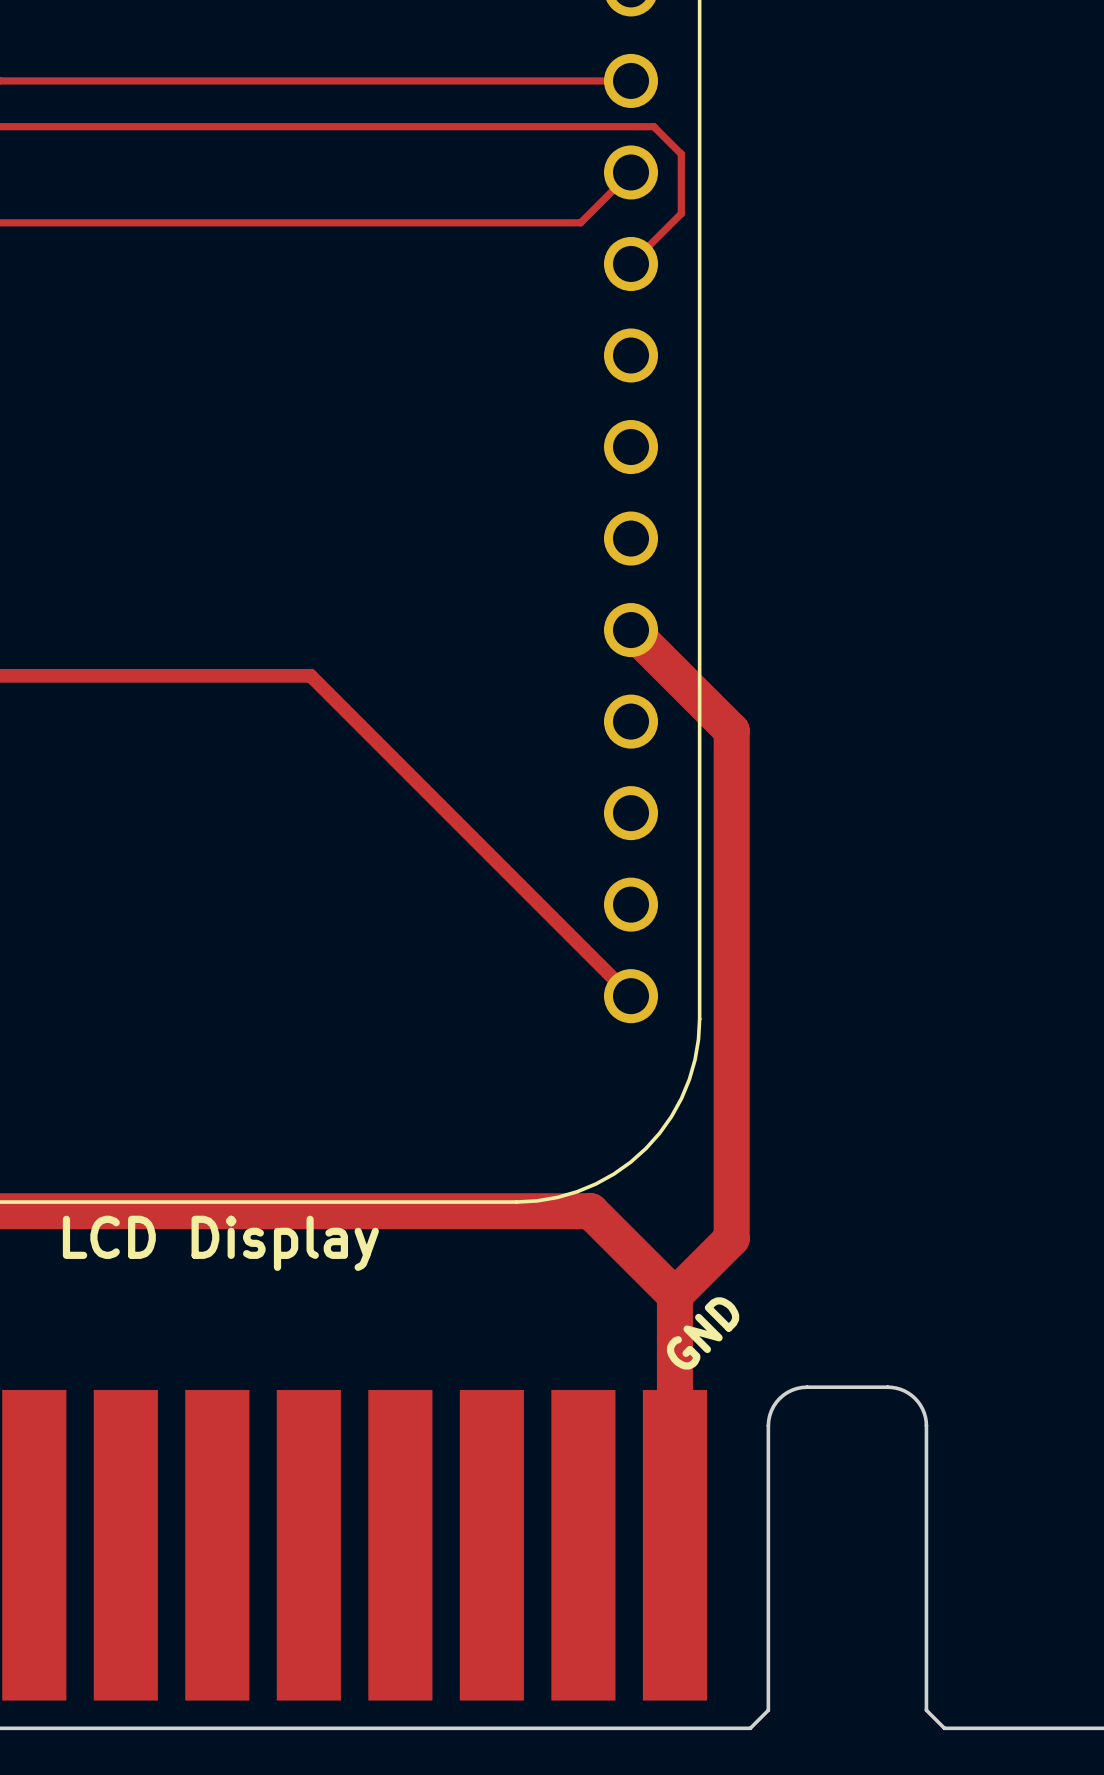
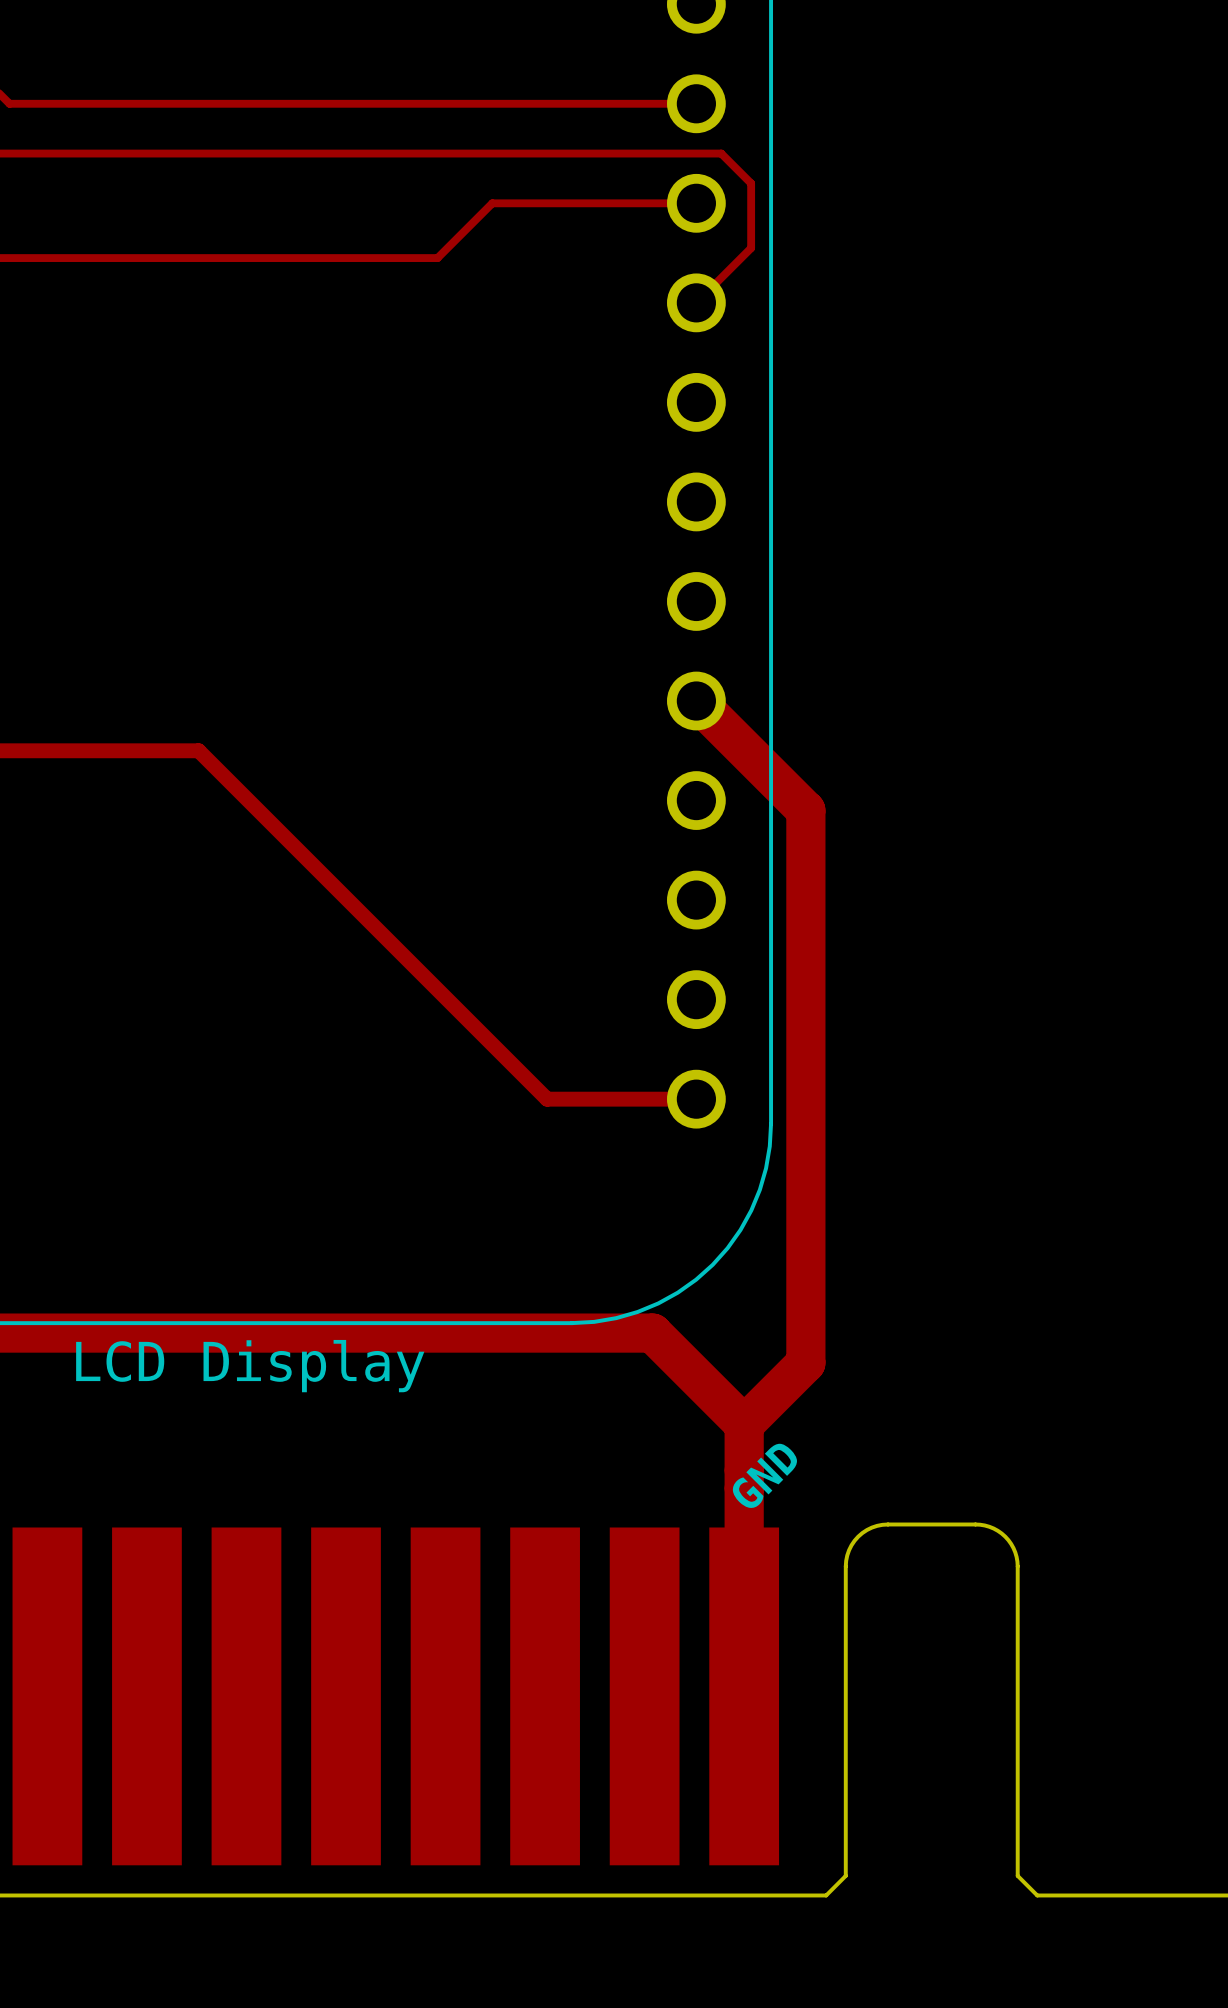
track: (631, 172) (580, 222) (393, 222) -> (696, 203) (492, 203) (437, 258)
track: (173, 675) (310, 675) (631, 996) -> (198, 750) (547, 1099) (696, 1099)

